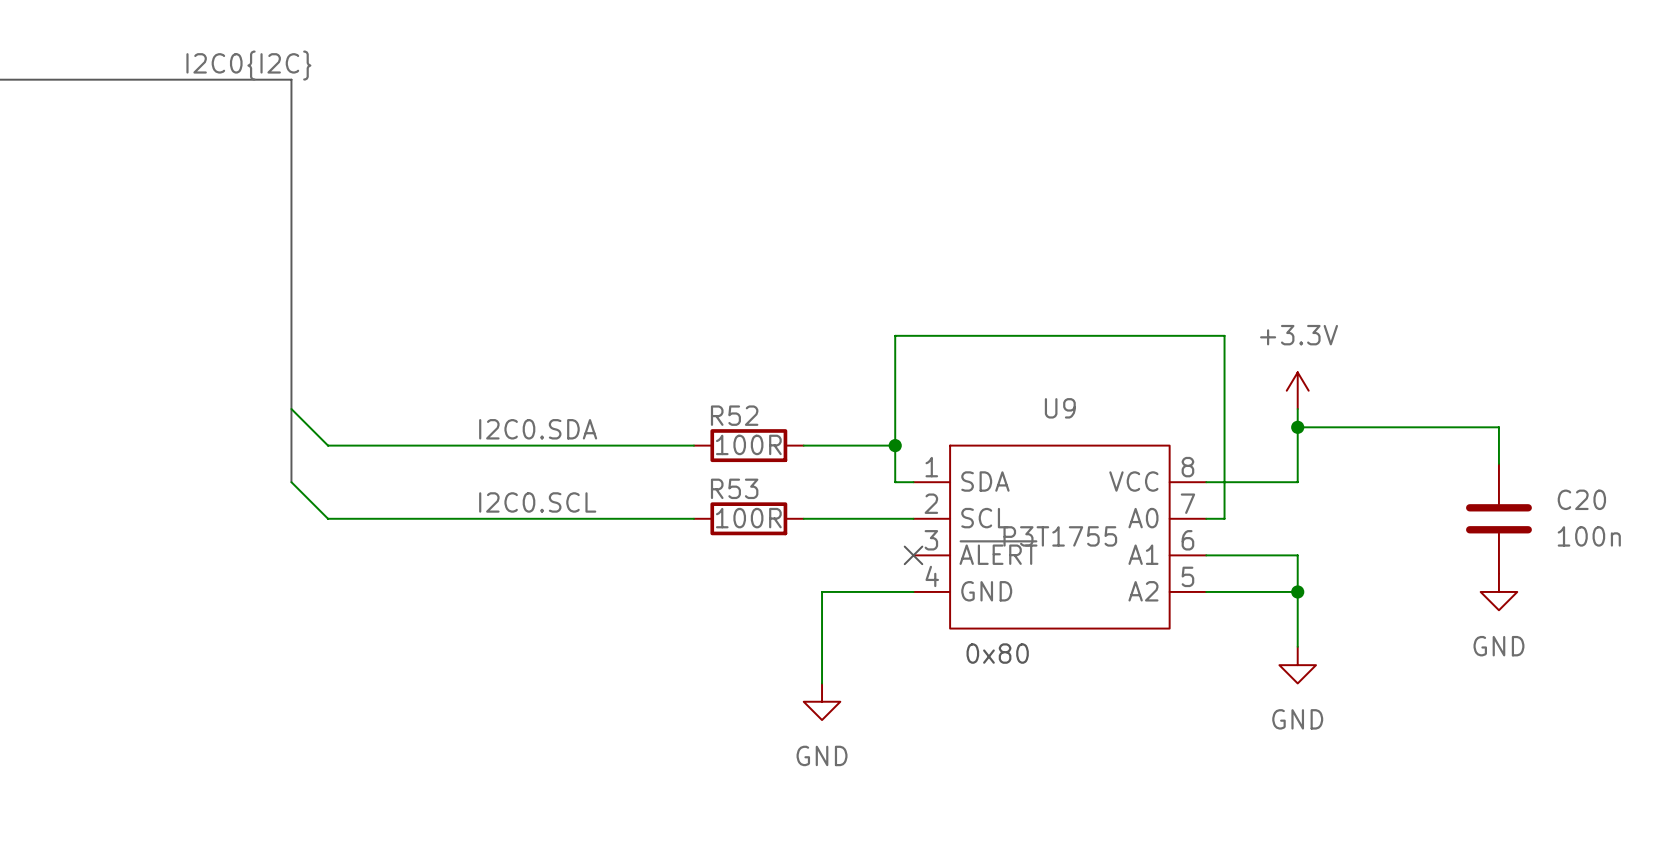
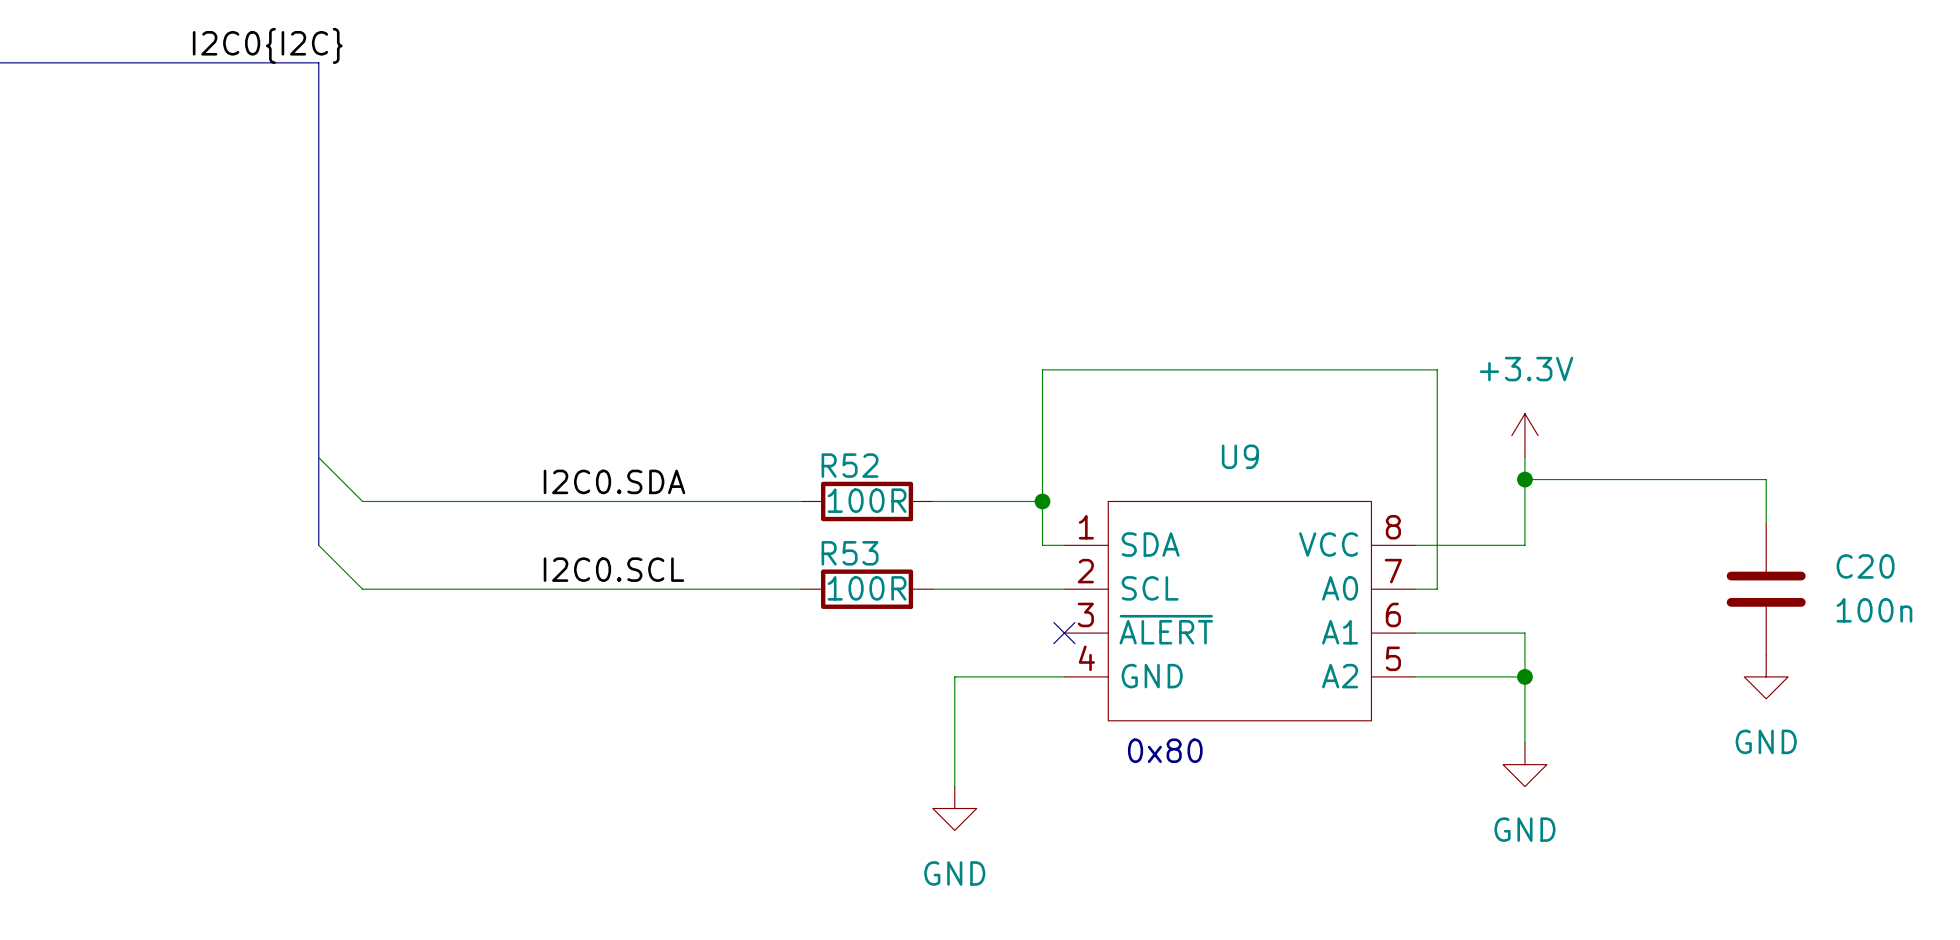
U9 value: P3T1755 (1060, 536) -> none

